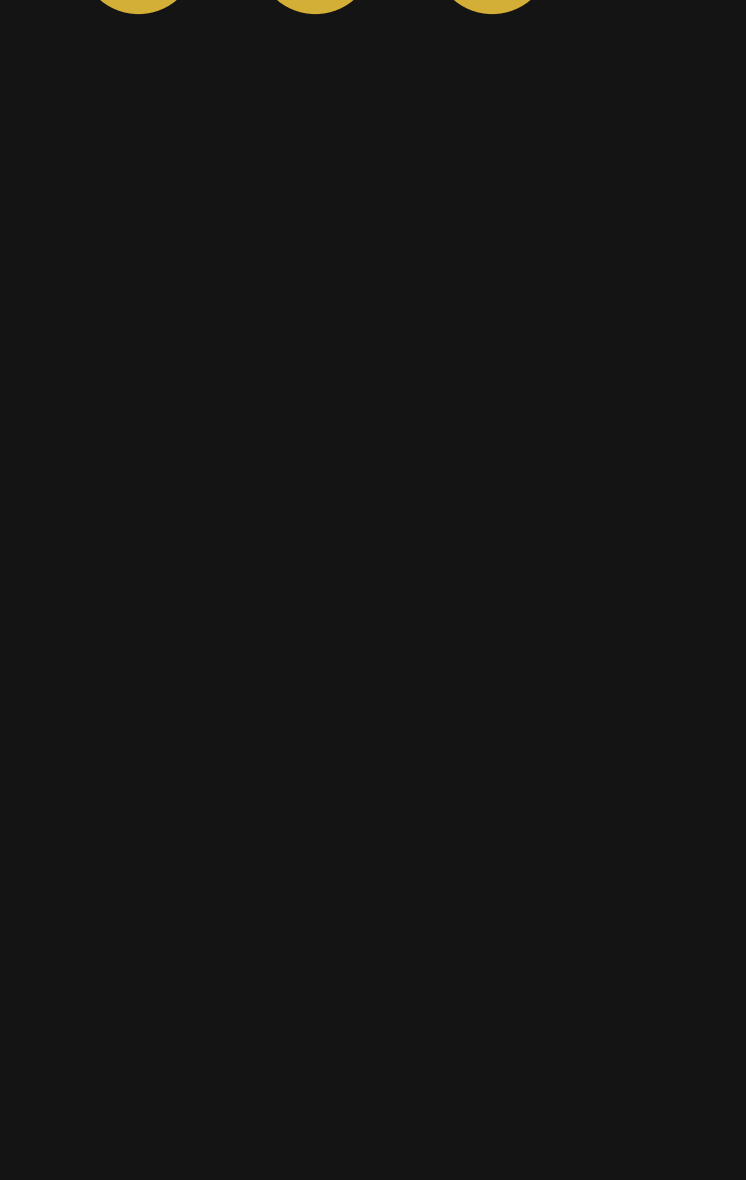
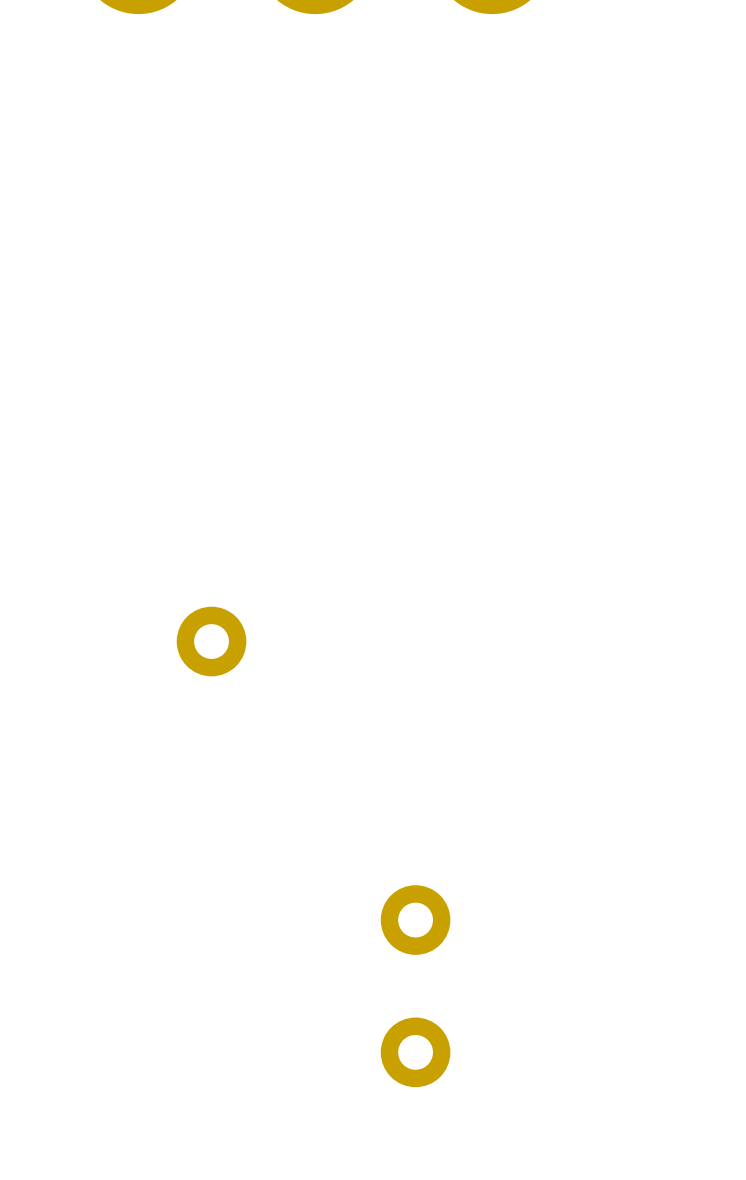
part: none -> (211, 641)
part: none -> (415, 986)

